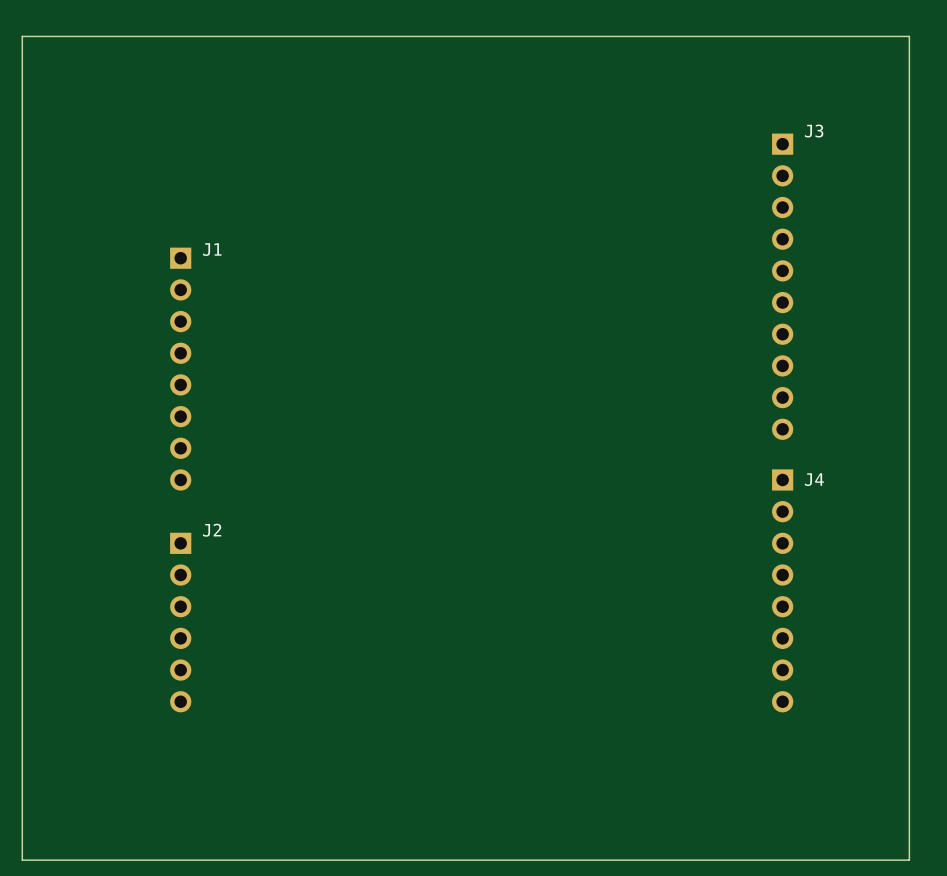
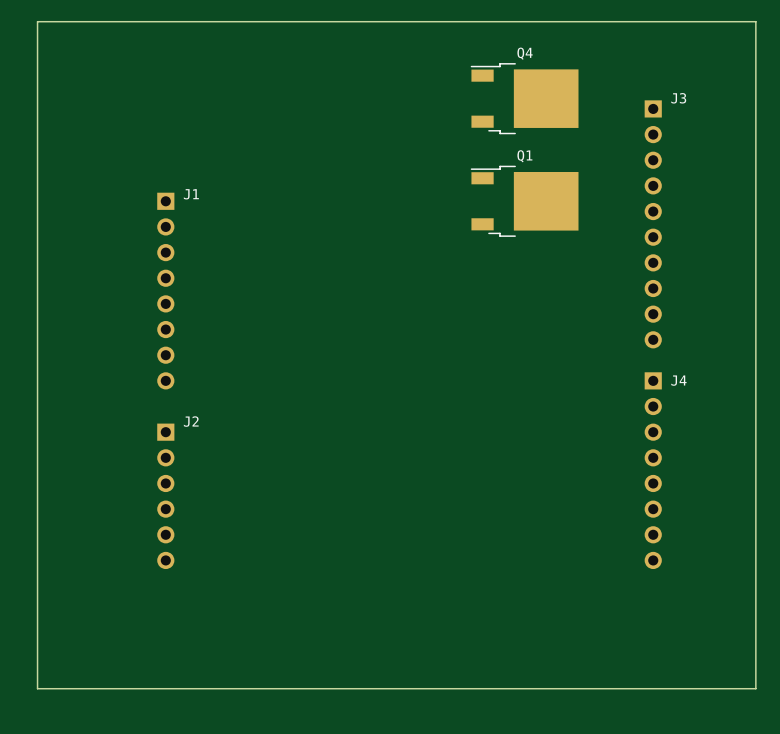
Q4: none -> (524, 98)
Q1: none -> (524, 201)

